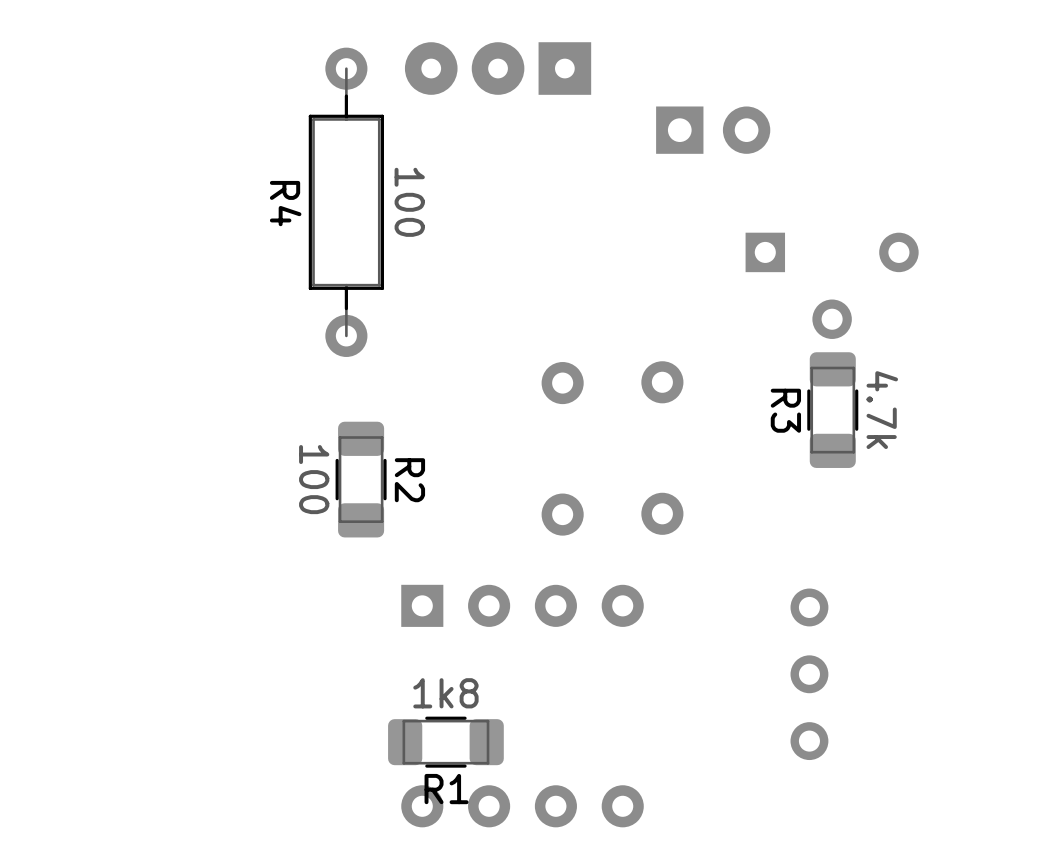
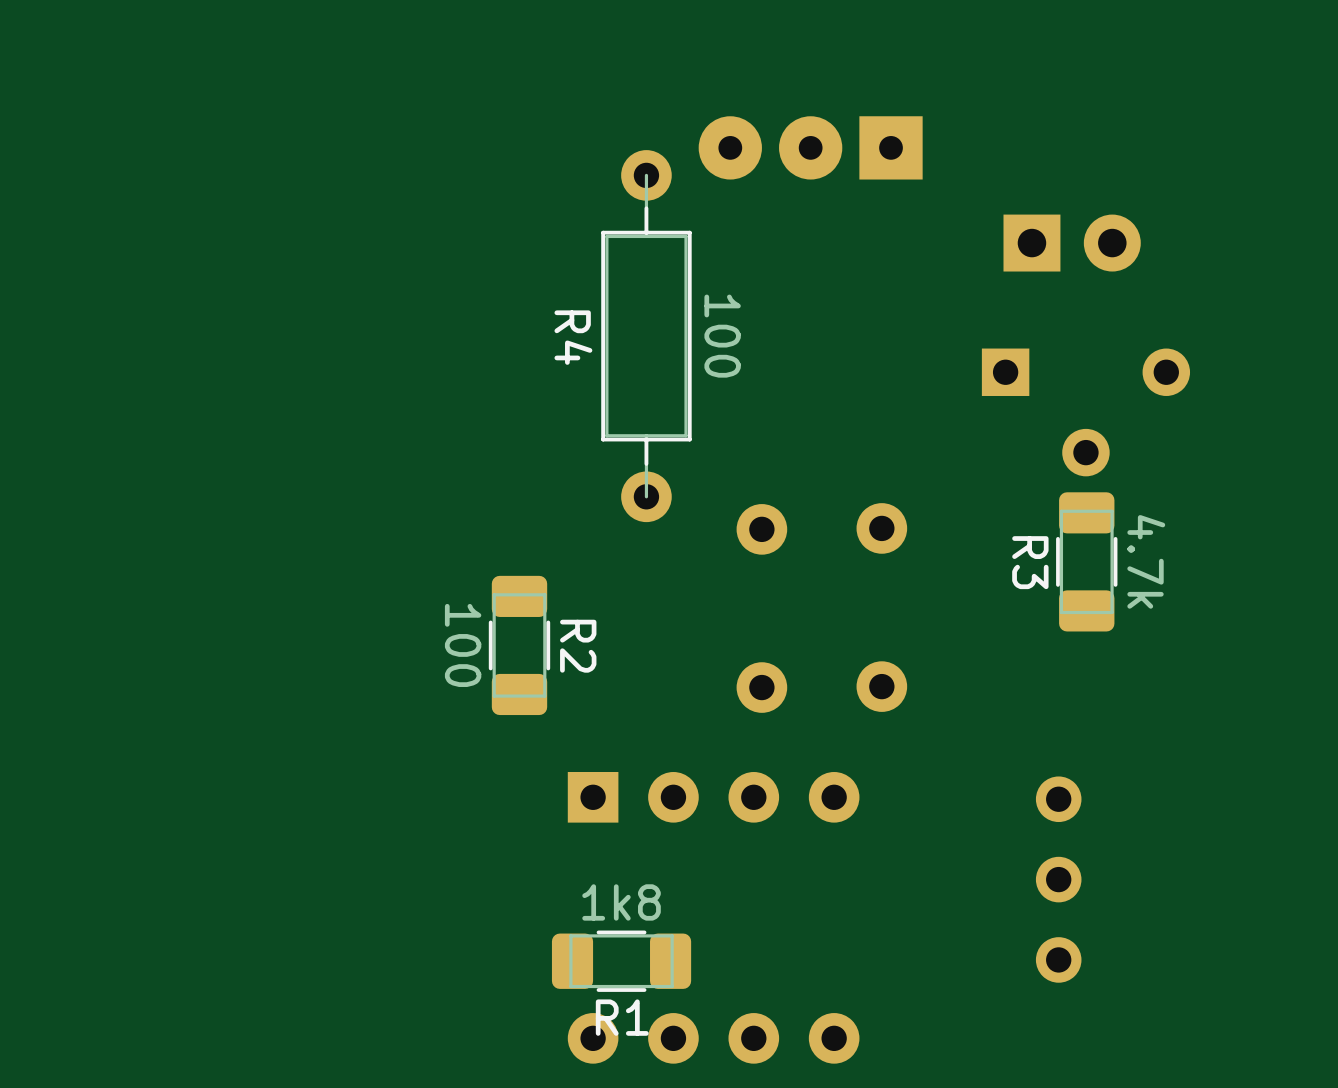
part position: (498, 68) -> (810, 147)
part position: (713, 130) -> (1072, 243)
R4 position: (346, 202) -> (646, 336)

